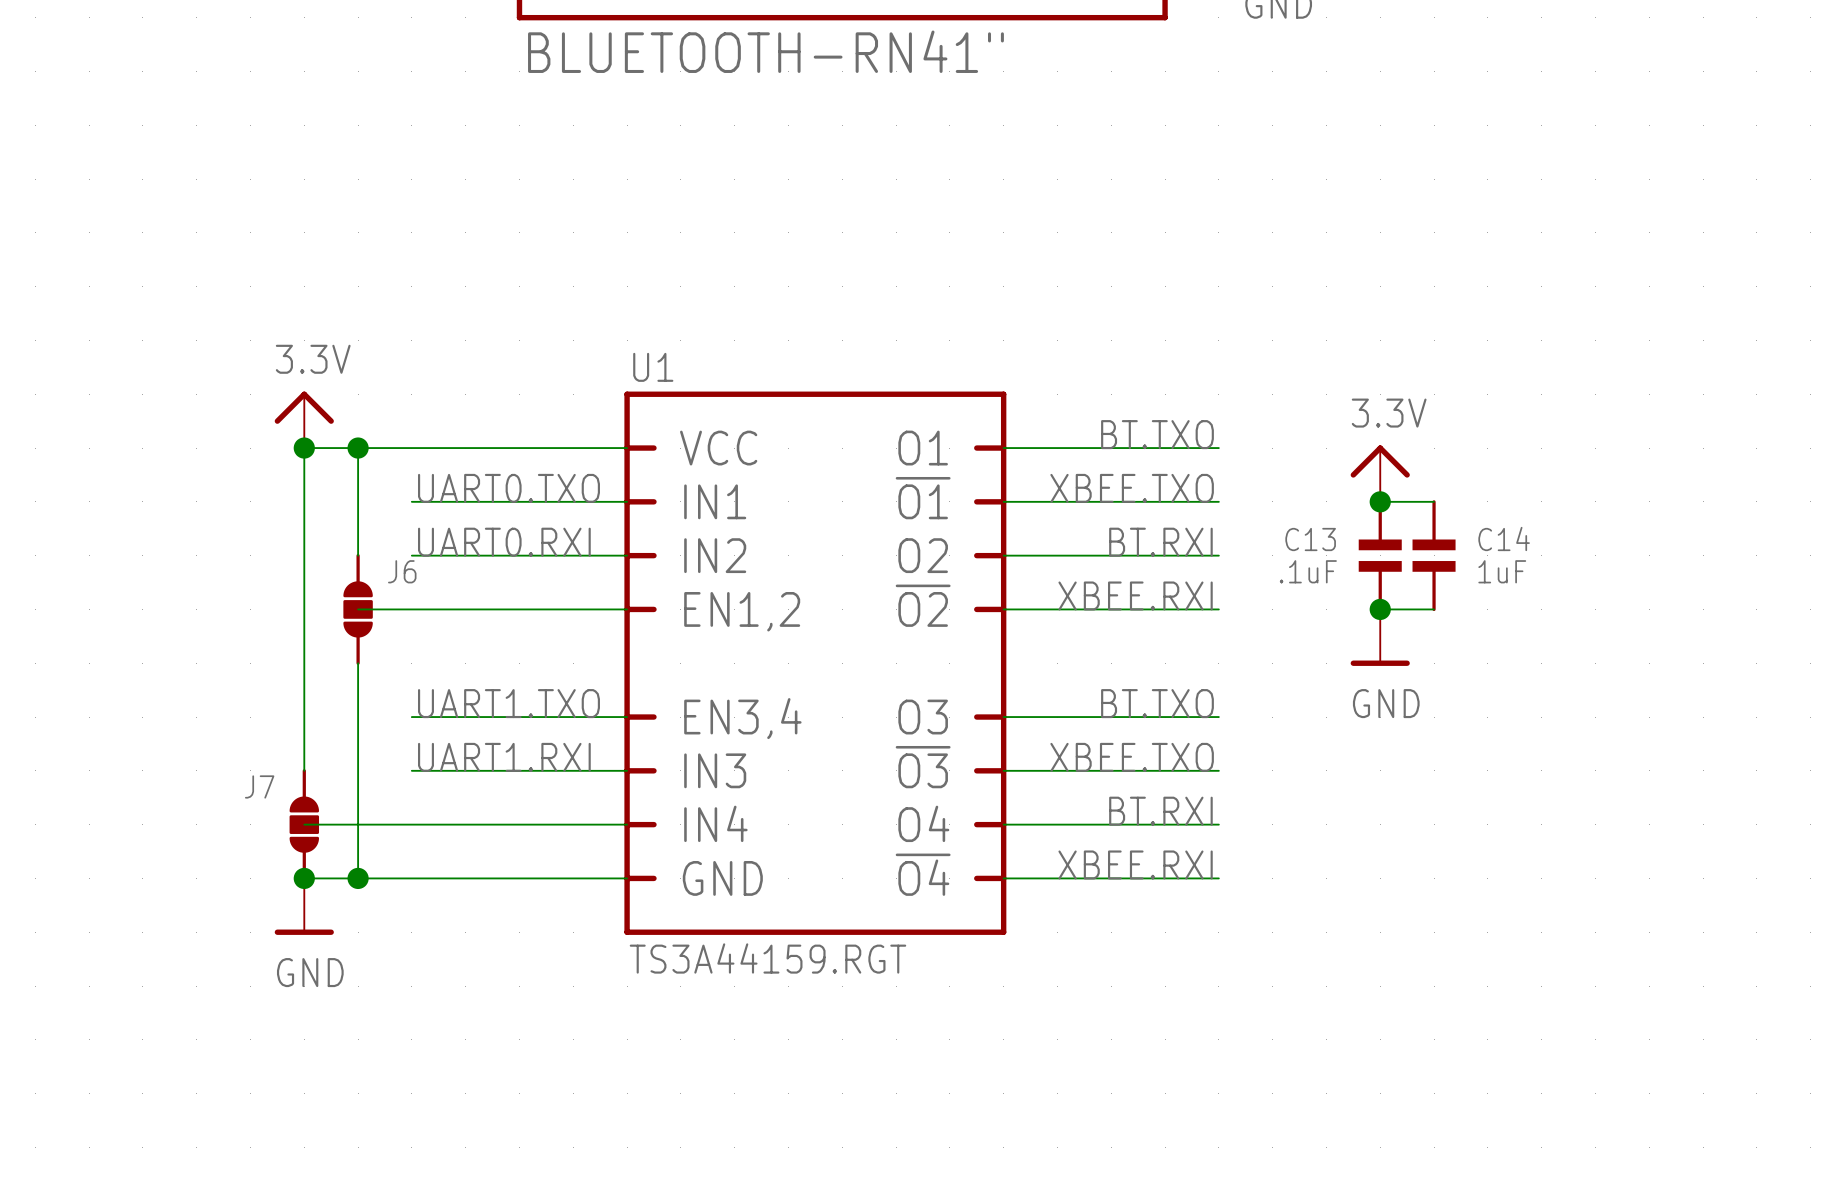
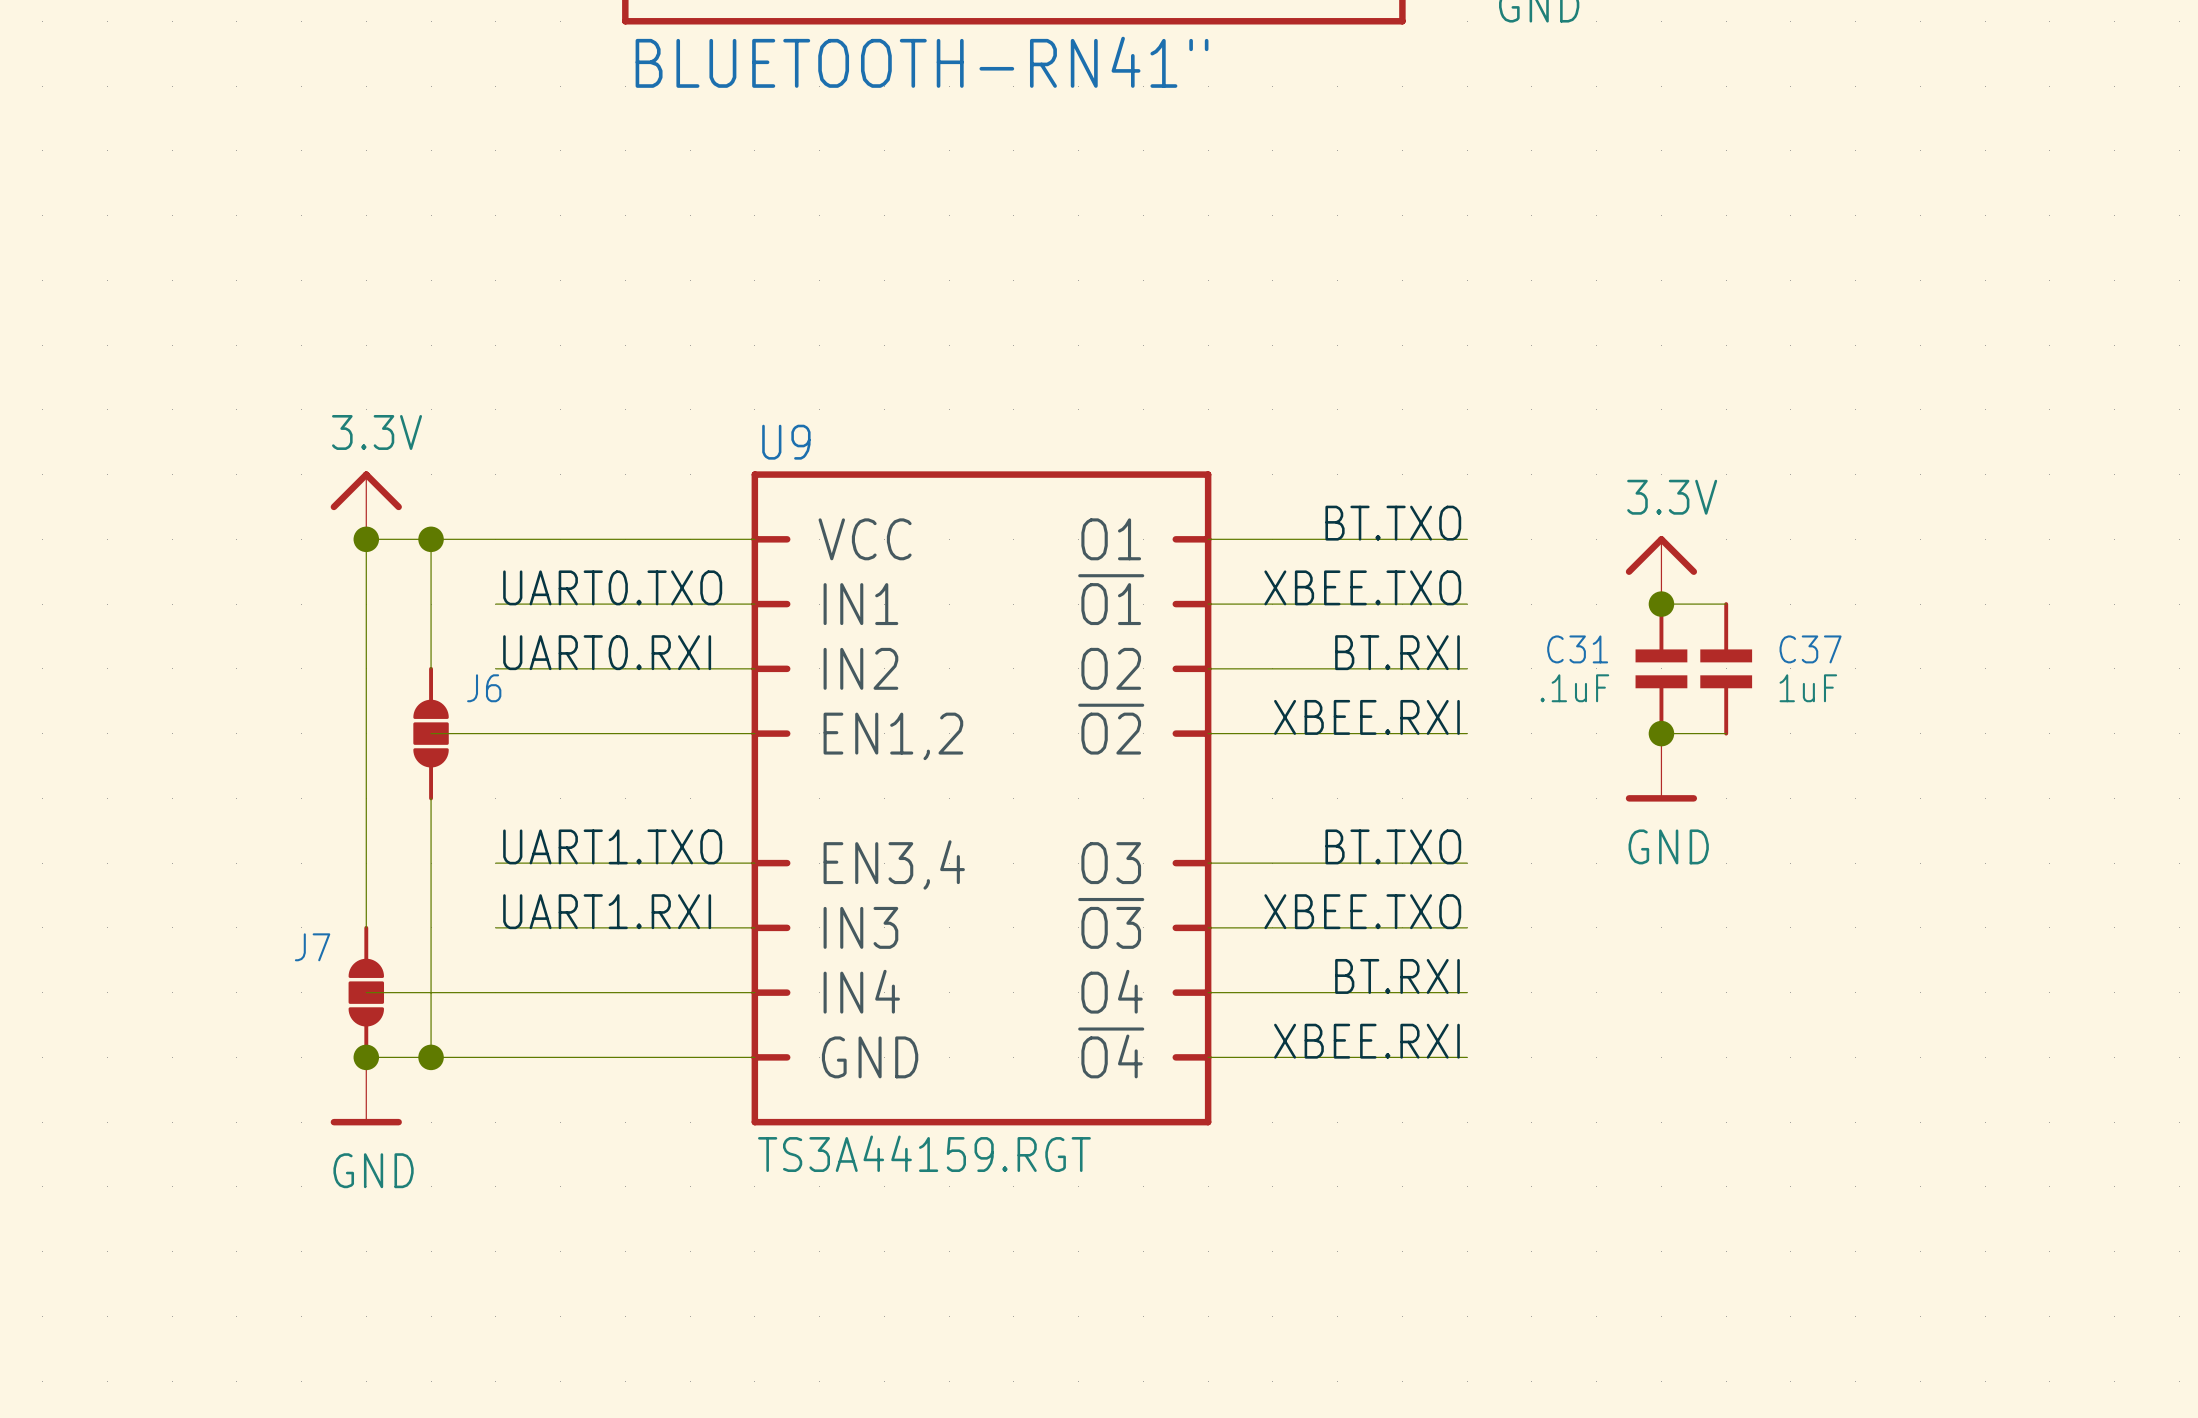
U1 name: U1 (653, 367) -> U9 (786, 442)
C14 name: C14 (1504, 538) -> C37 (1810, 649)
C13 name: C13 (1310, 539) -> C31 (1577, 649)

